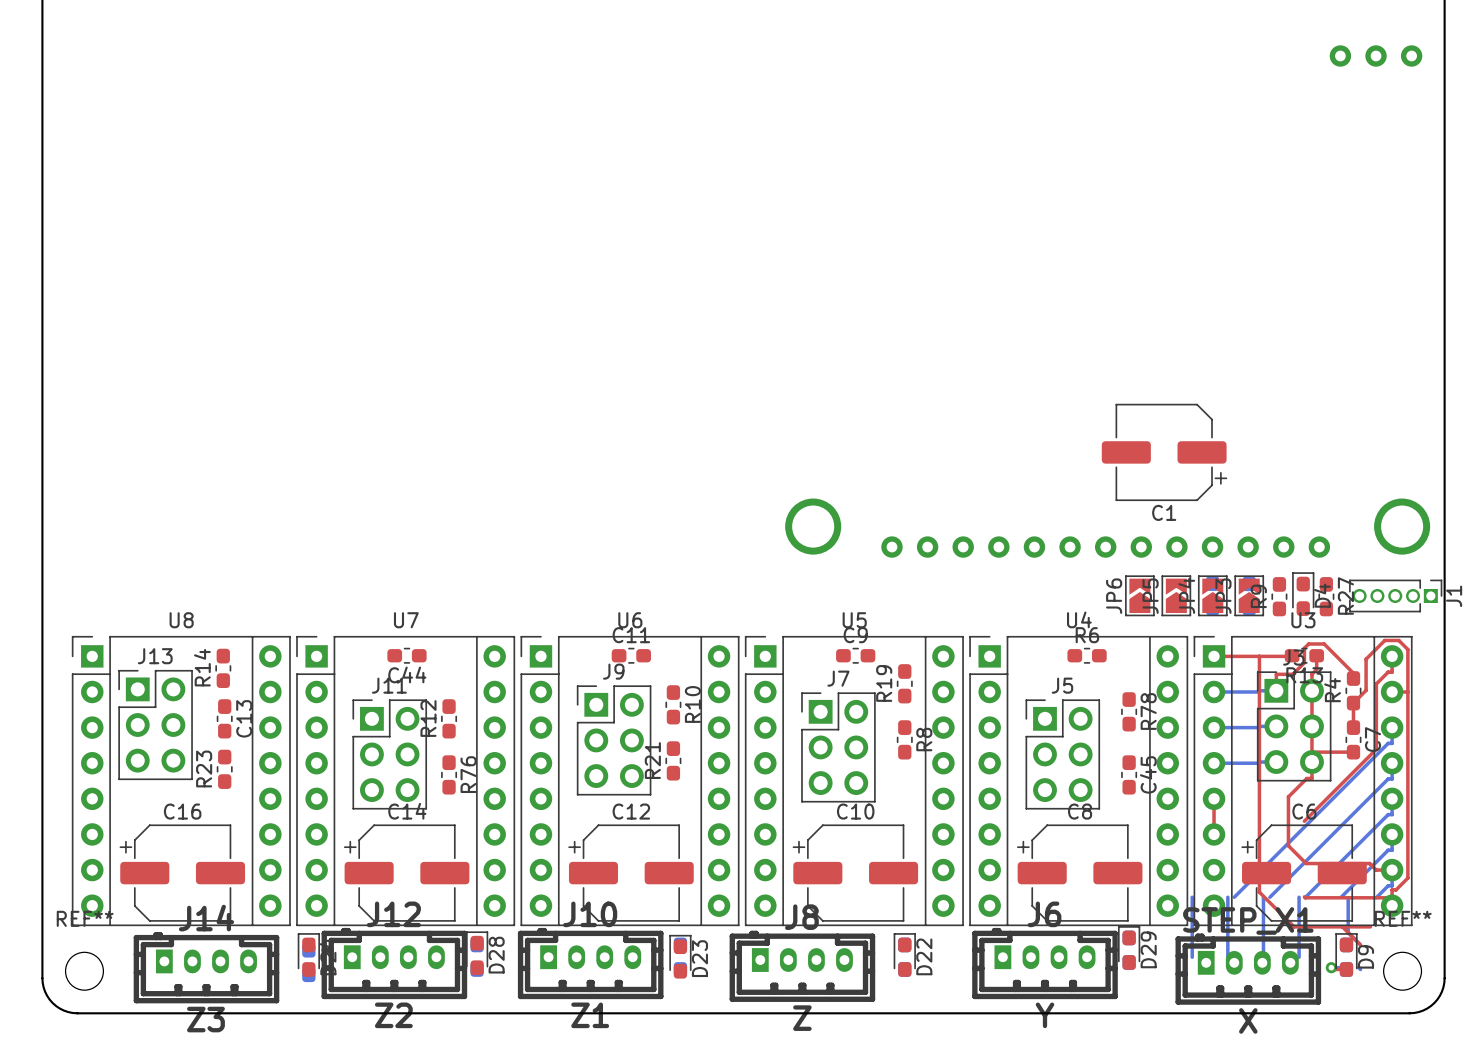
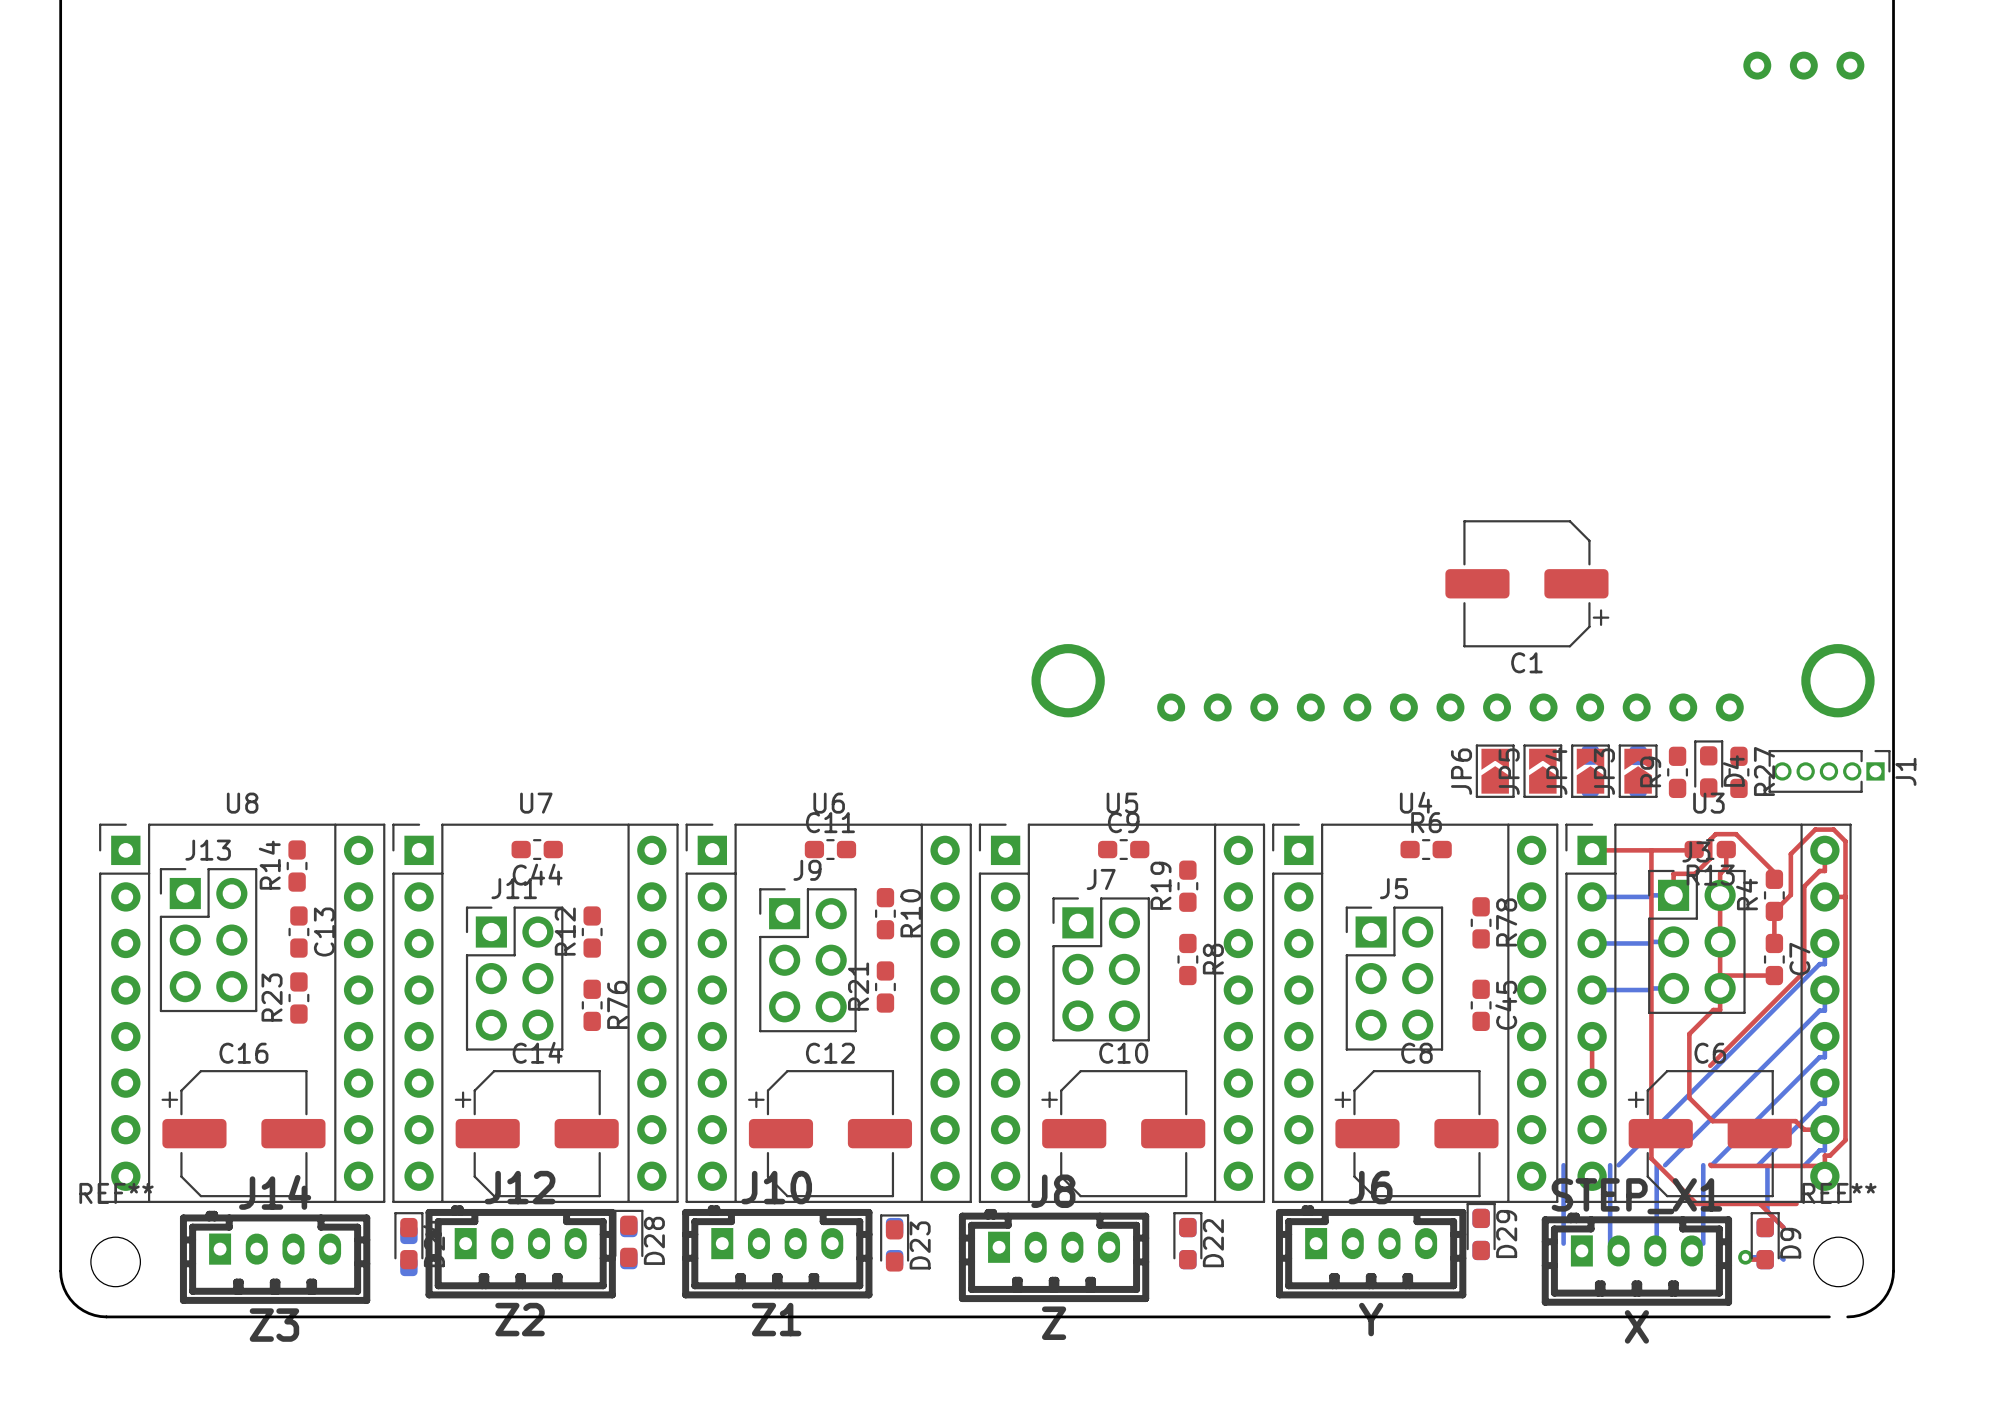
board edge: (1395, 1013) (1409, 1013) -> none

